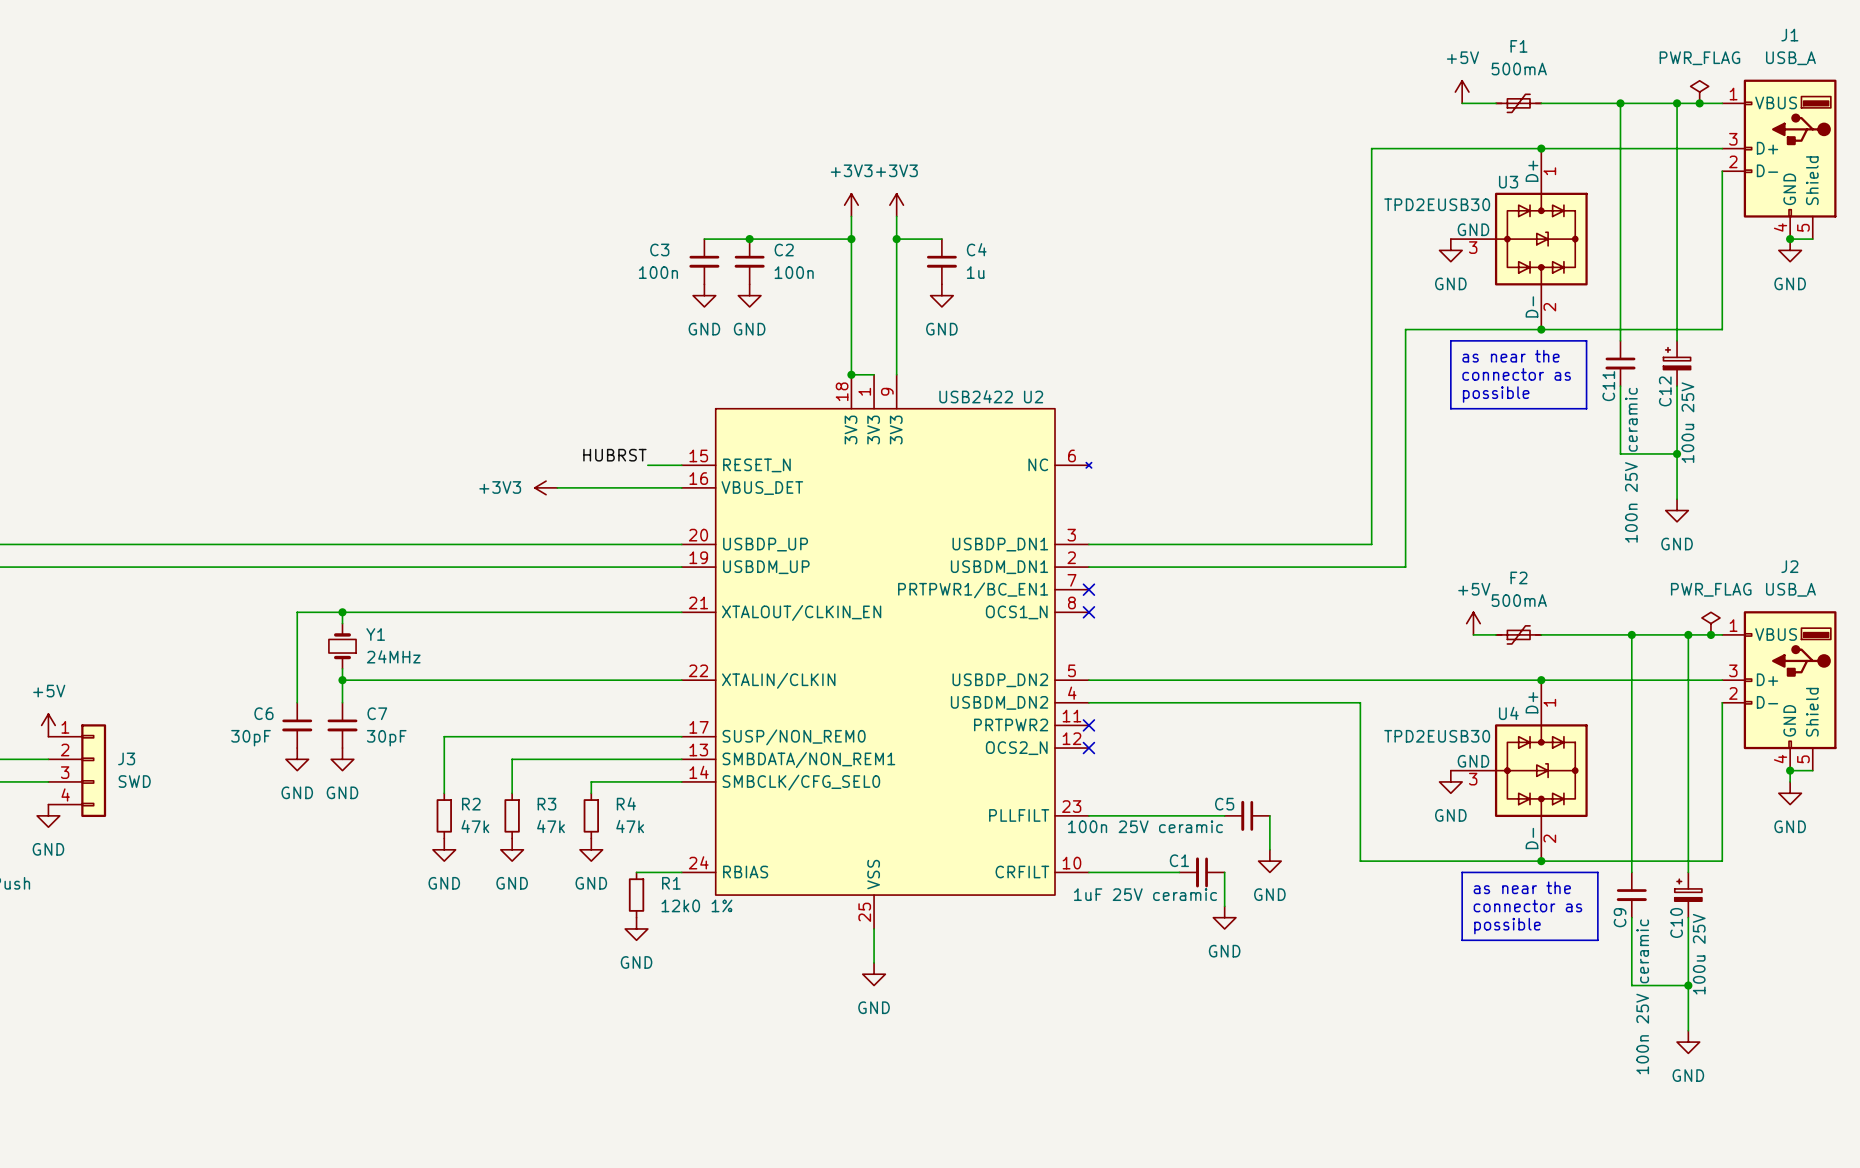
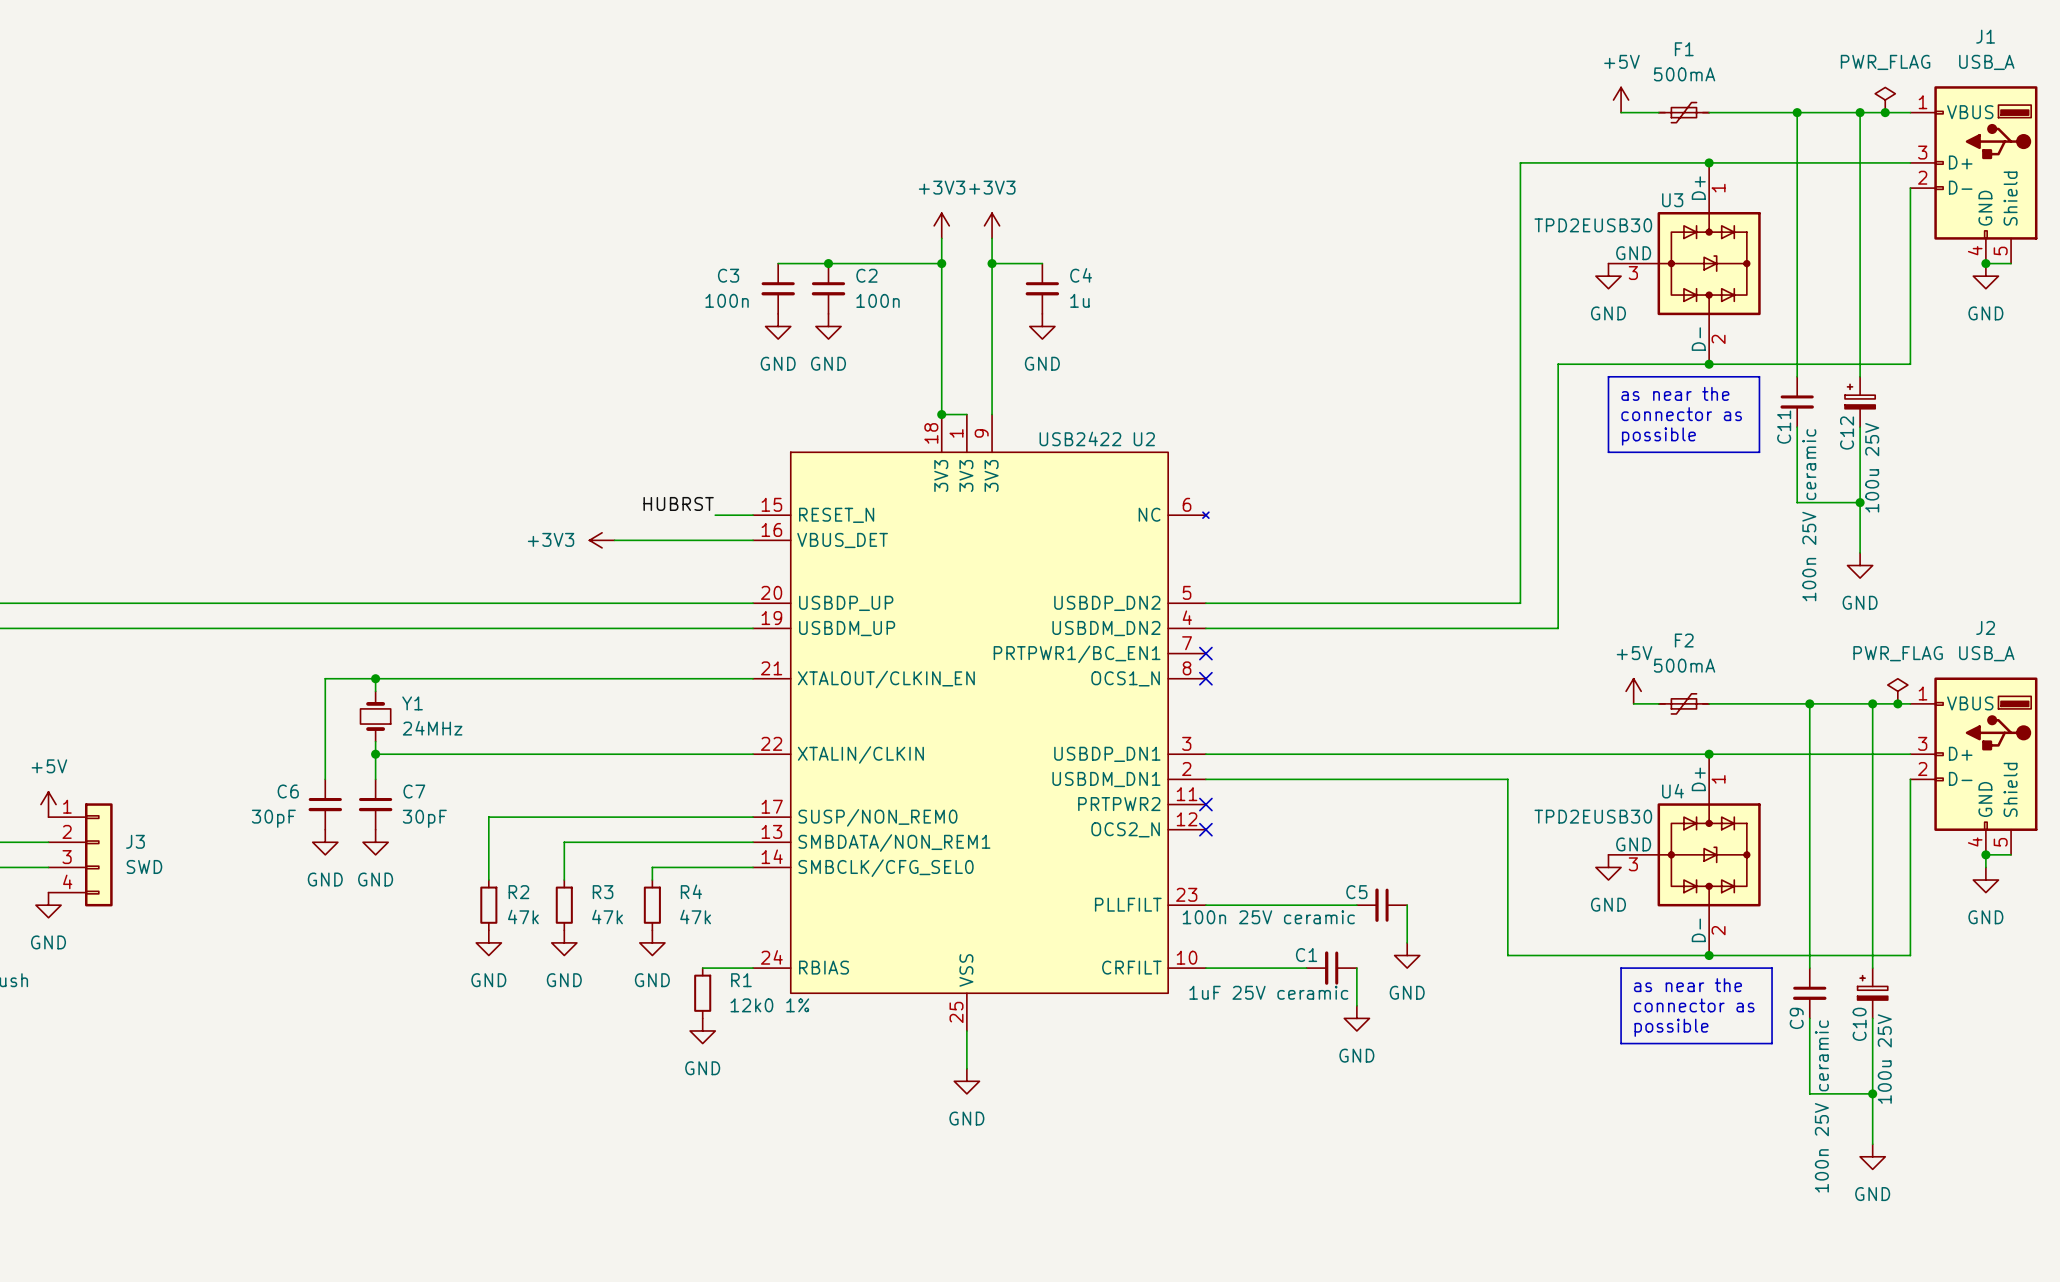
U2 pin number: 3 (1071, 535) -> 5 (1187, 592)
U2 pin name: USBDP_DN1 (1000, 544) -> USBDP_DN2 (1107, 603)
U2 pin number: 2 (1071, 557) -> 4 (1187, 617)
U2 pin name: USBDM_DN1 (999, 567) -> USBDM_DN2 (1106, 628)
U2 pin number: 5 (1071, 670) -> 3 (1186, 743)
U2 pin name: USBDP_DN2 (1000, 680) -> USBDP_DN1 (1107, 754)
U2 pin number: 4 (1072, 693) -> 2 (1186, 769)
U2 pin name: USBDM_DN2 (999, 702) -> USBDM_DN1 (1106, 779)

